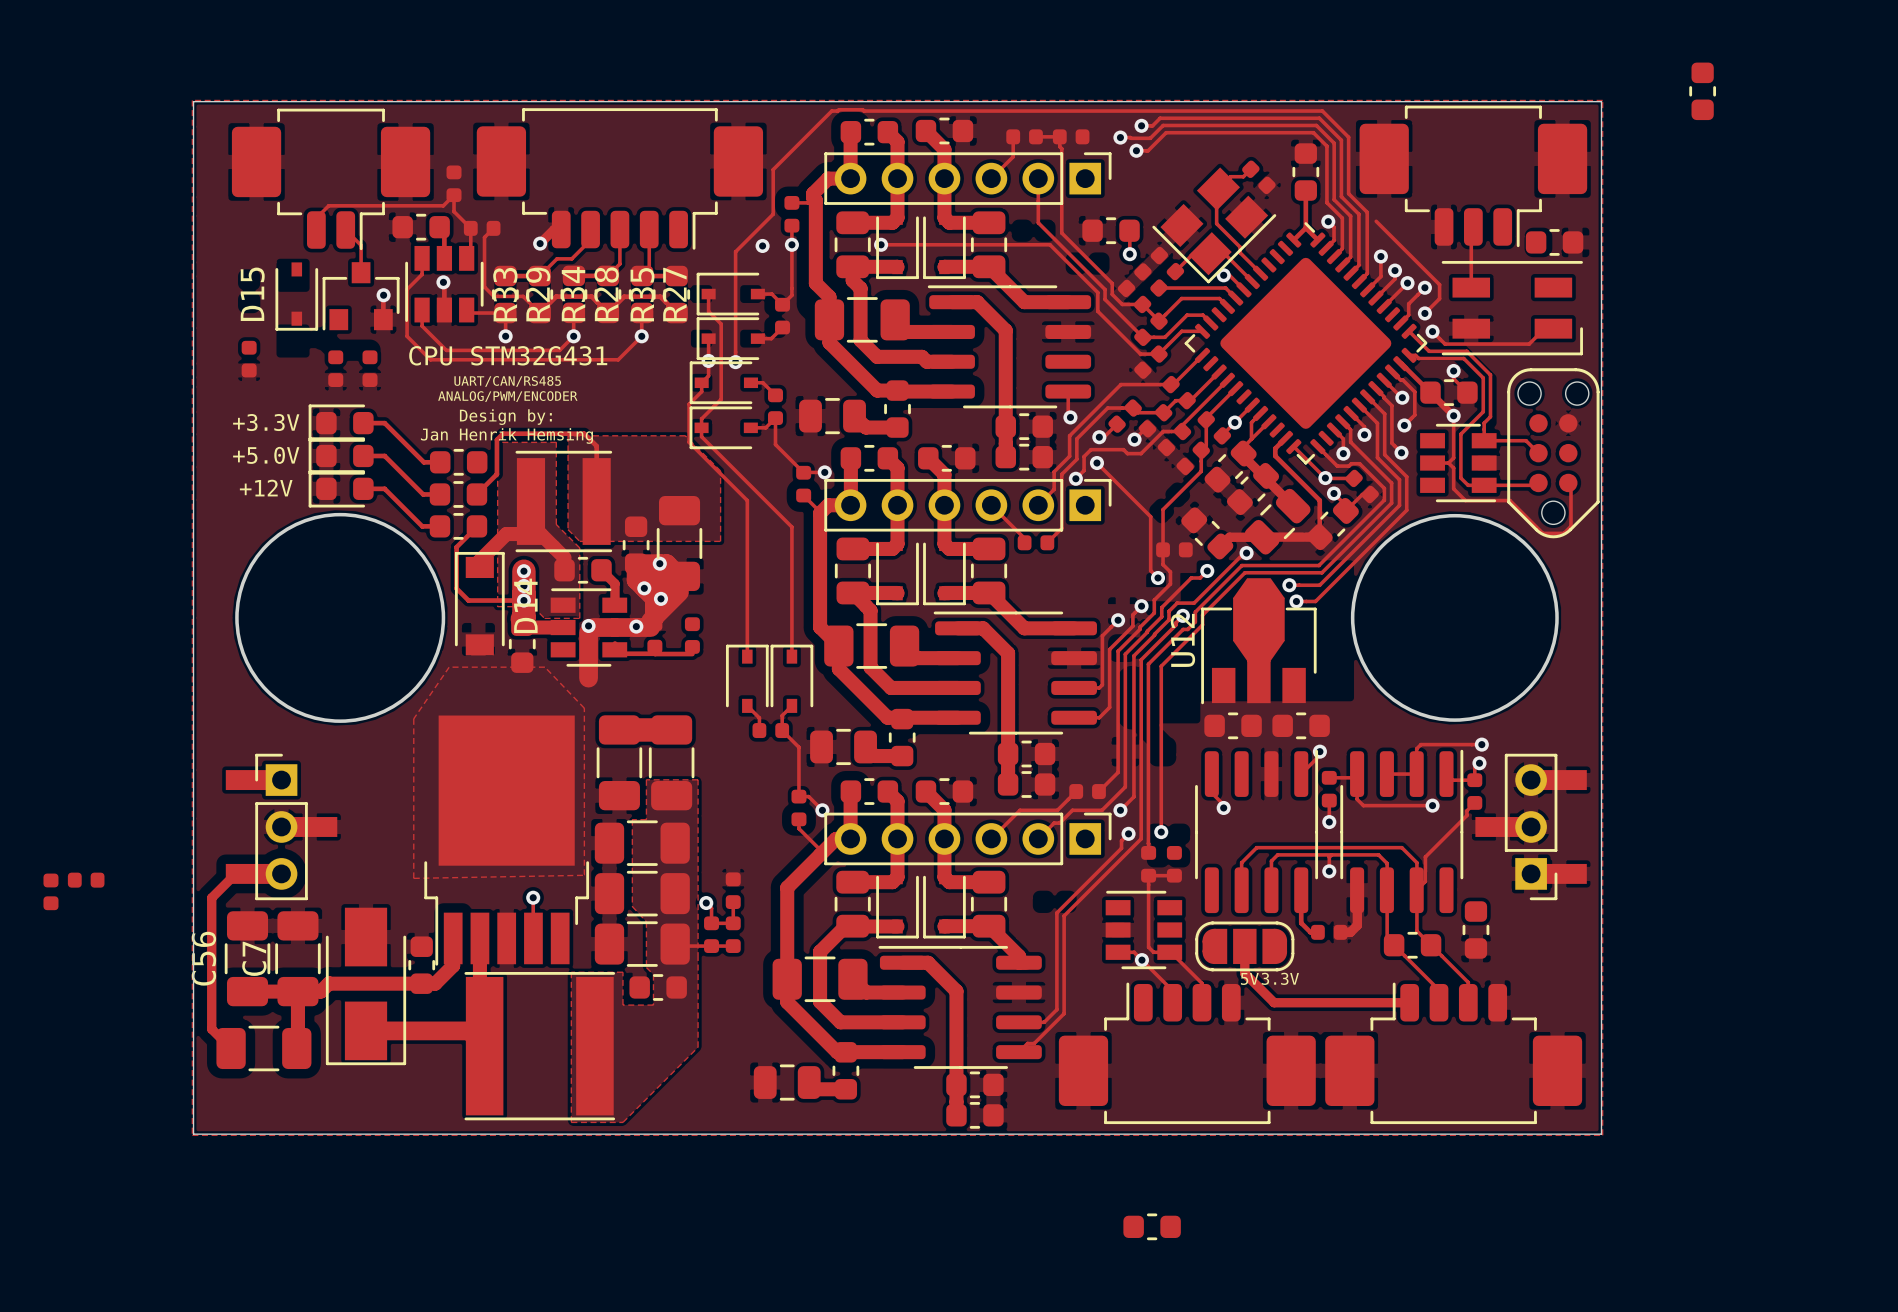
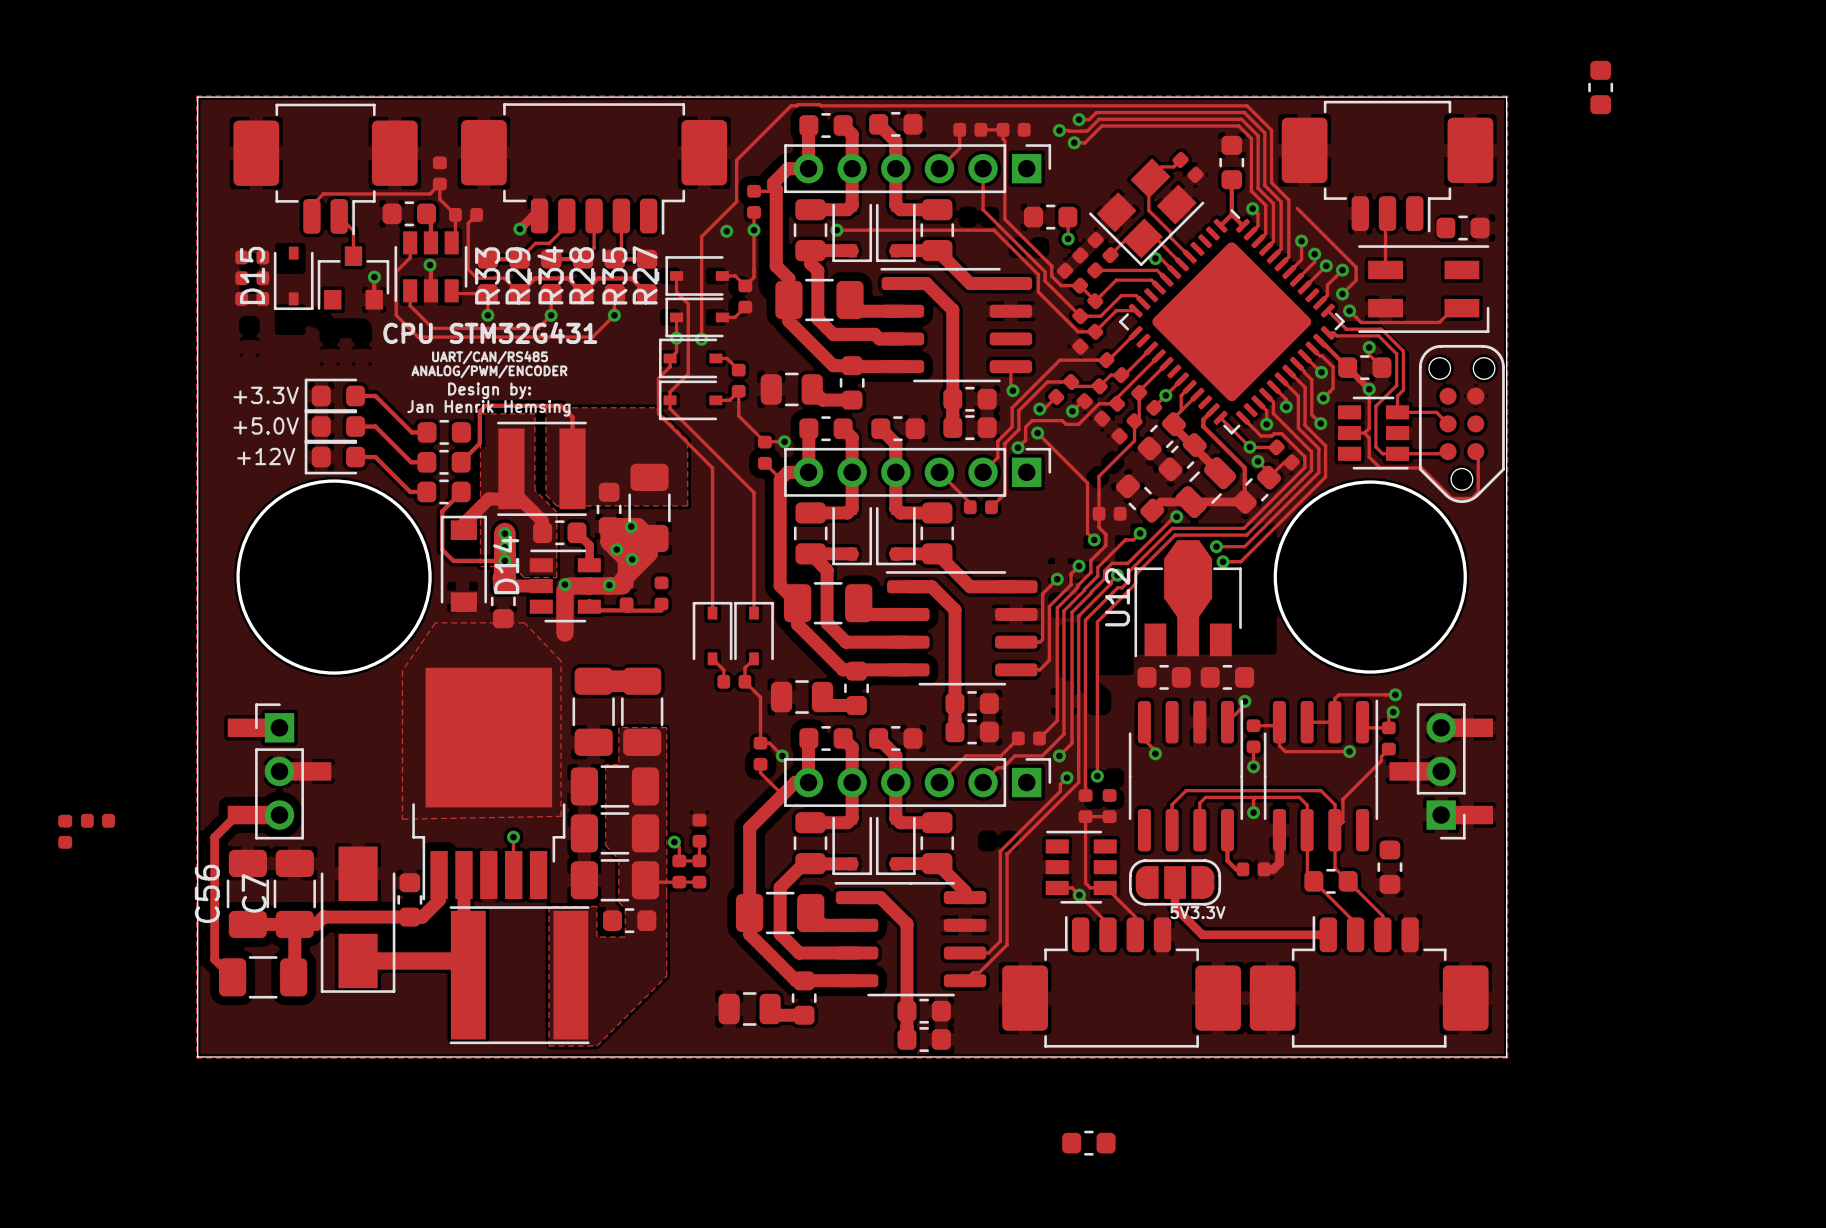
part: none -> (252, 257)
part: none -> (252, 278)
part: none -> (252, 298)
part: (249, 359) -> none
part: (335, 368) -> none
part: (370, 368) -> none

